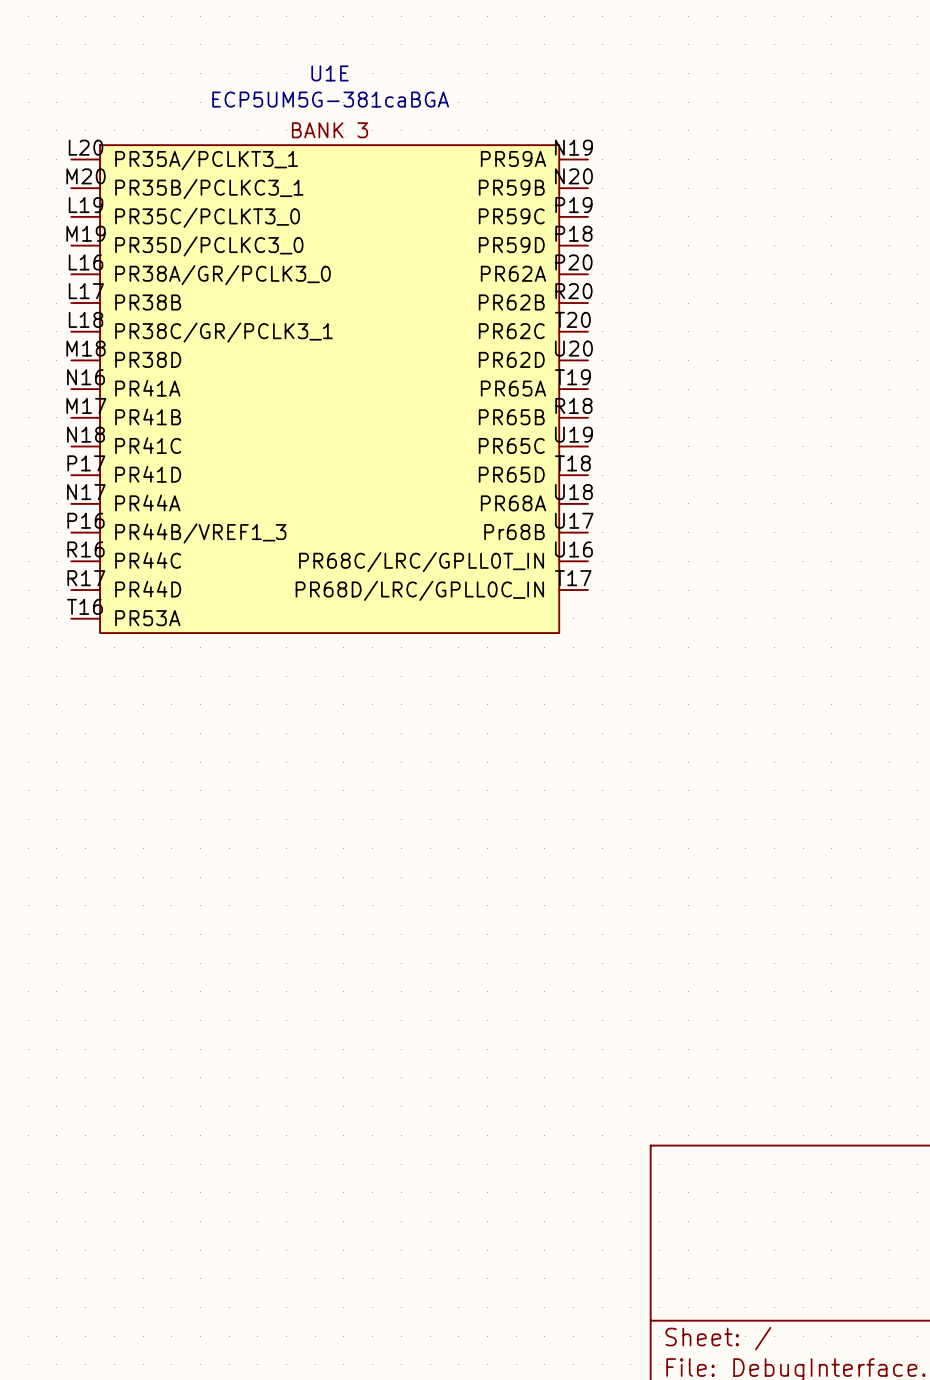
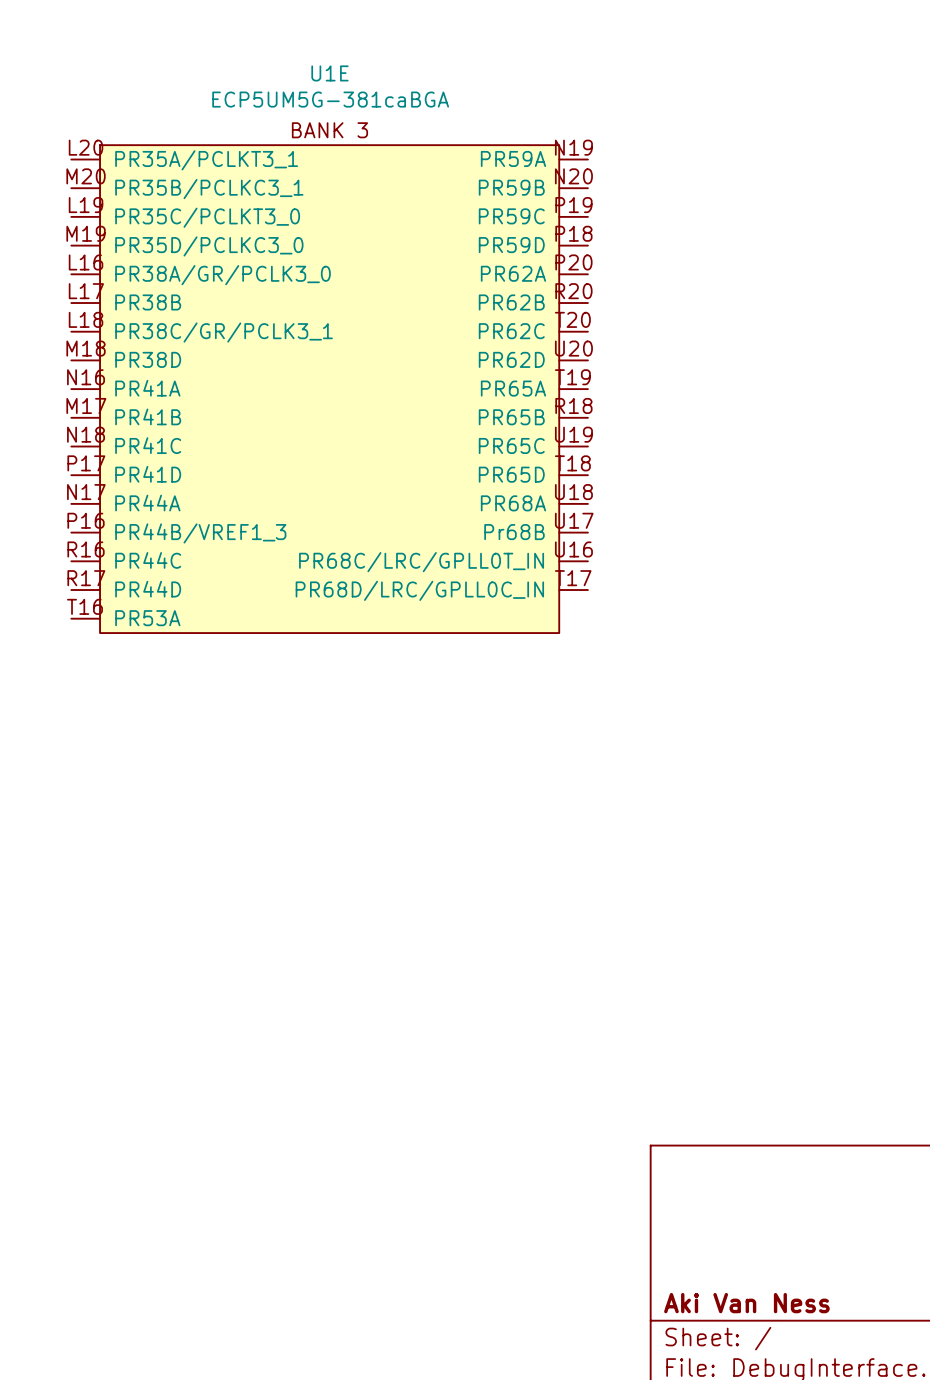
title block: none -> Aki Van Ness (746, 1303)

